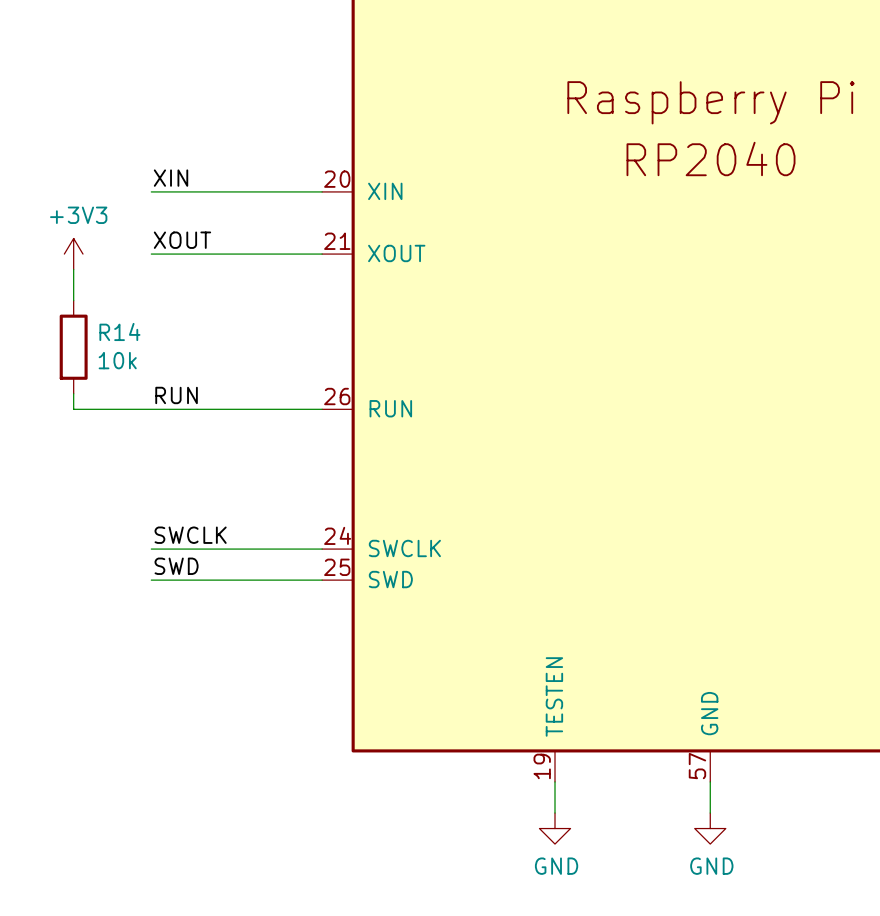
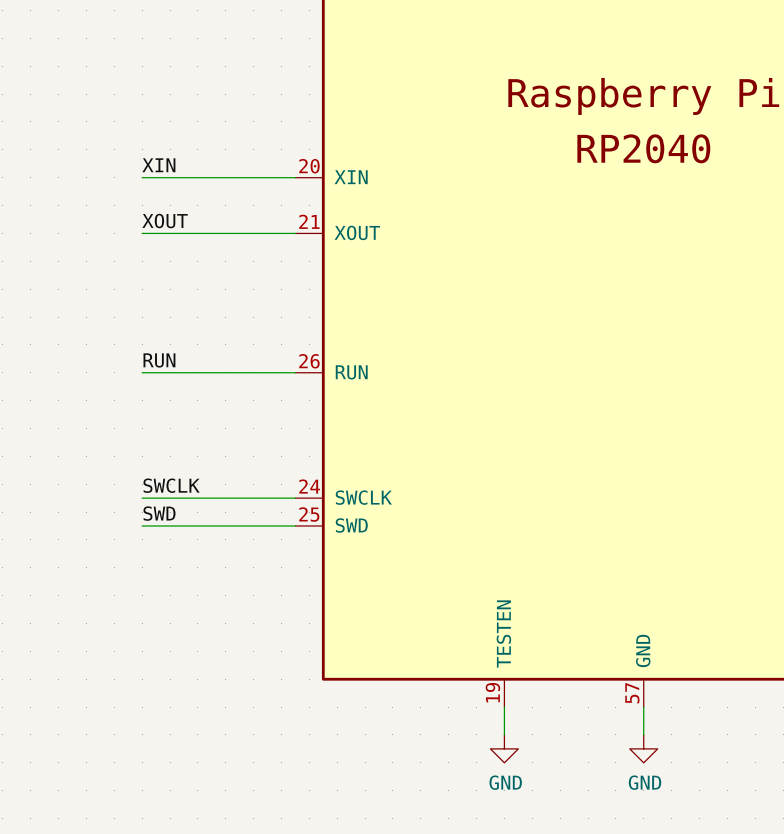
power symbol: +3V3 (73, 254) -> none
wire: (73, 269) (73, 300) -> none
R14: 10k (73, 347) -> none
wire: (73, 393) (73, 409) (151, 409) -> none

